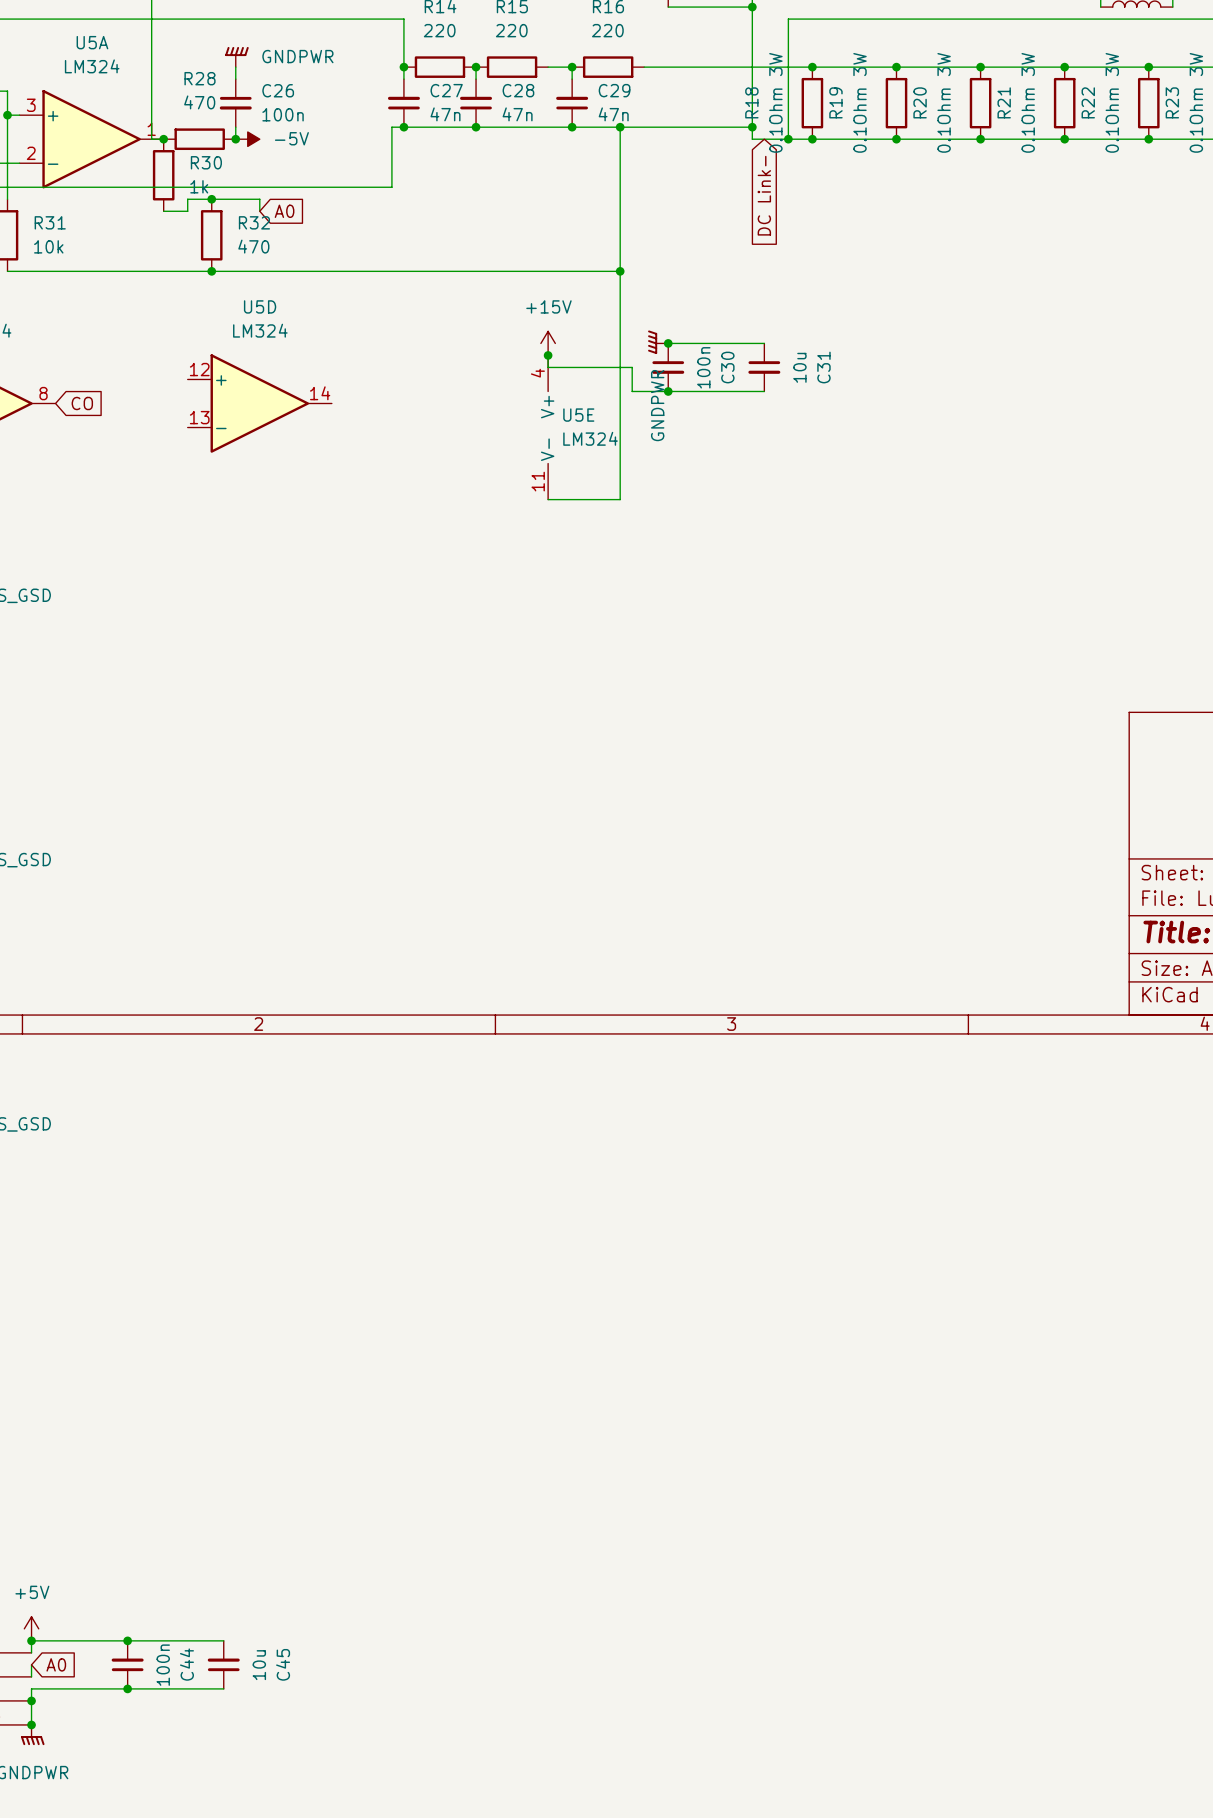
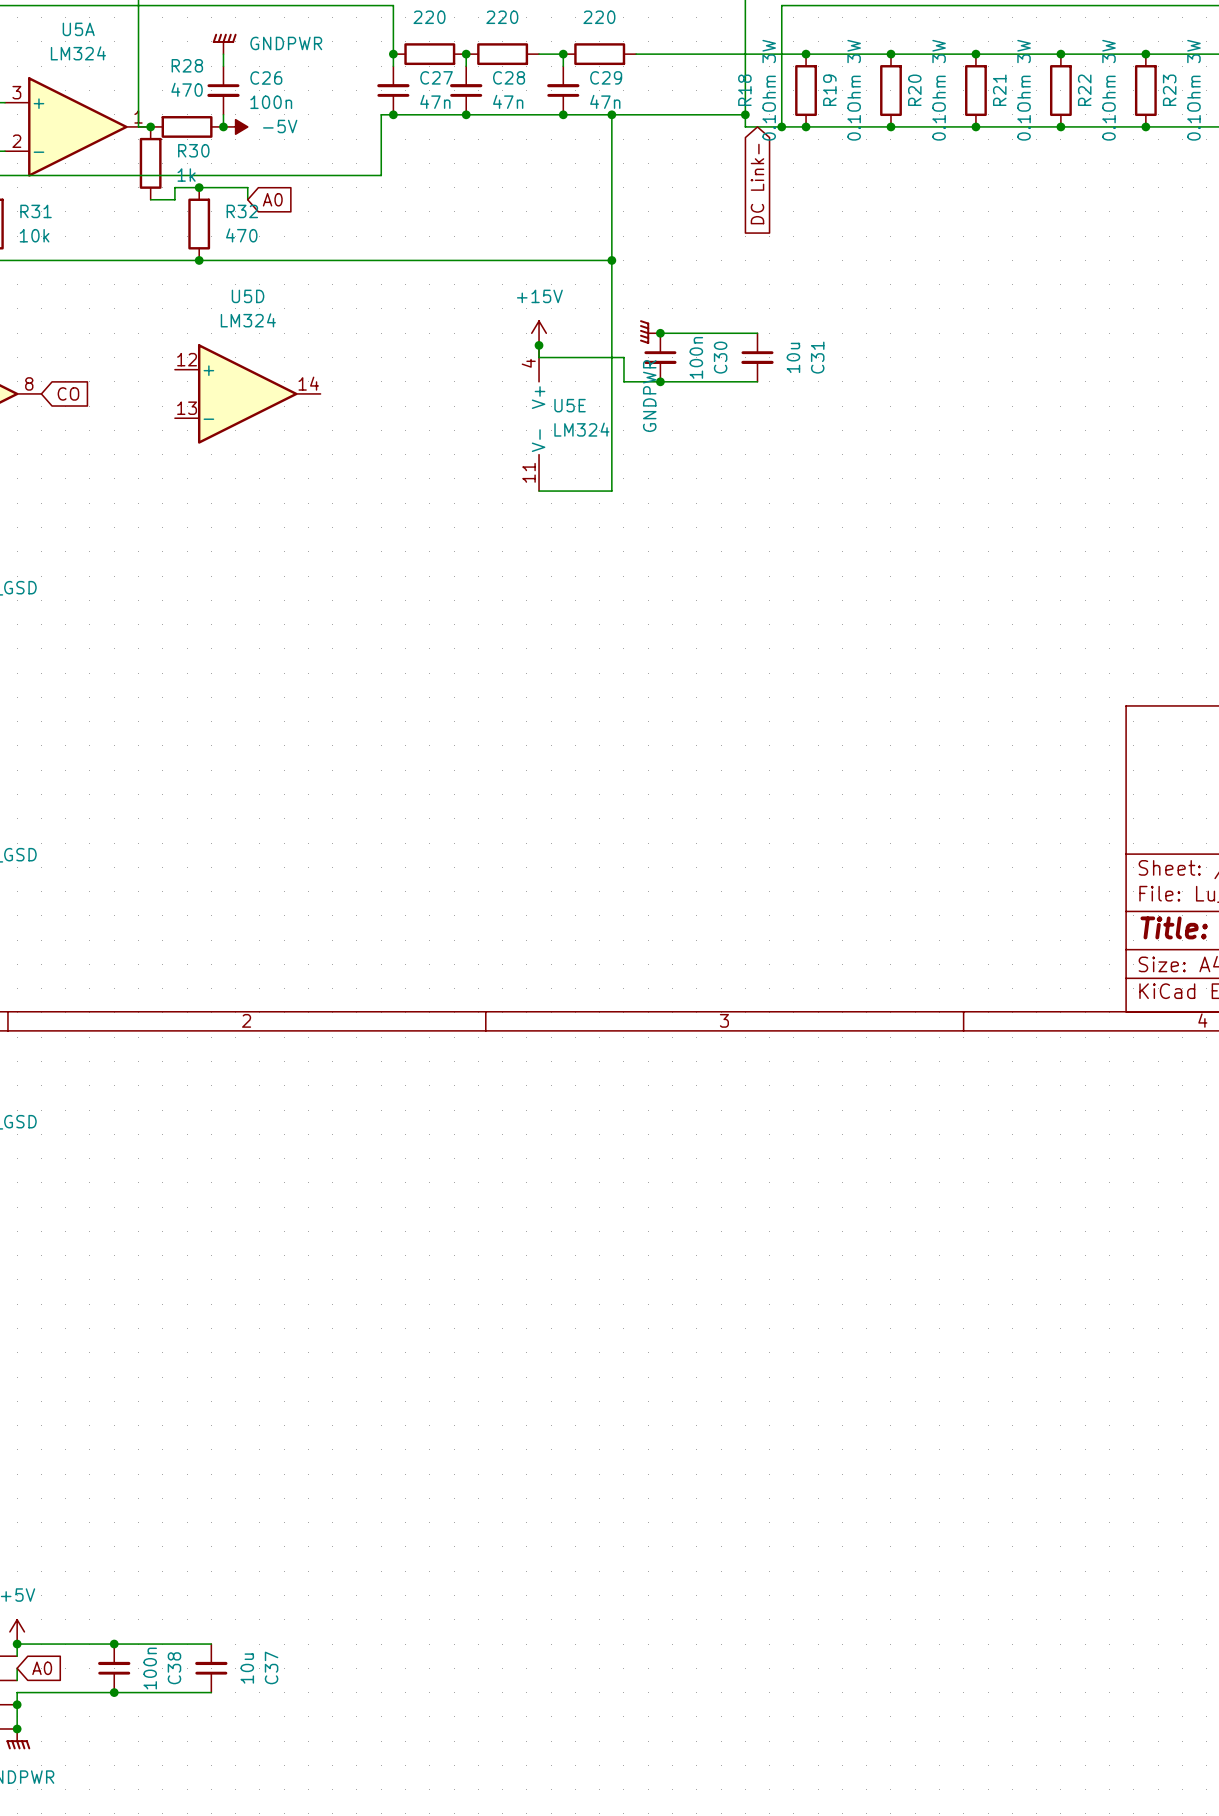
C44 name: C44 (186, 1664) -> C38 (174, 1668)
C45 name: C45 (283, 1664) -> C37 (271, 1667)

